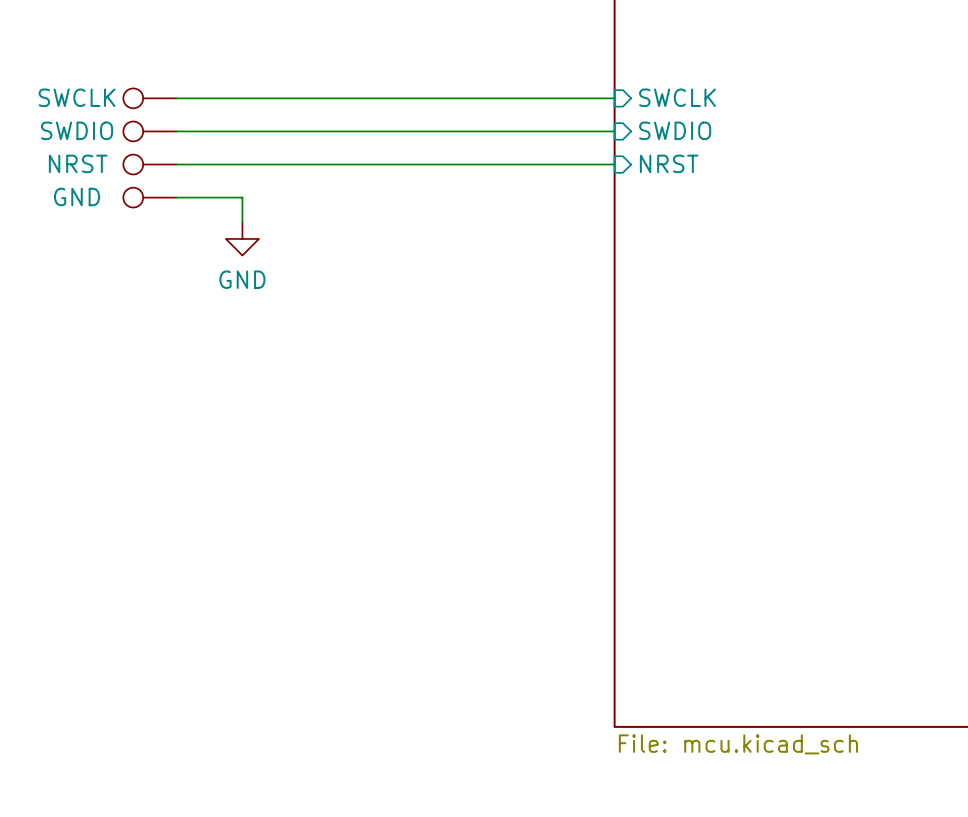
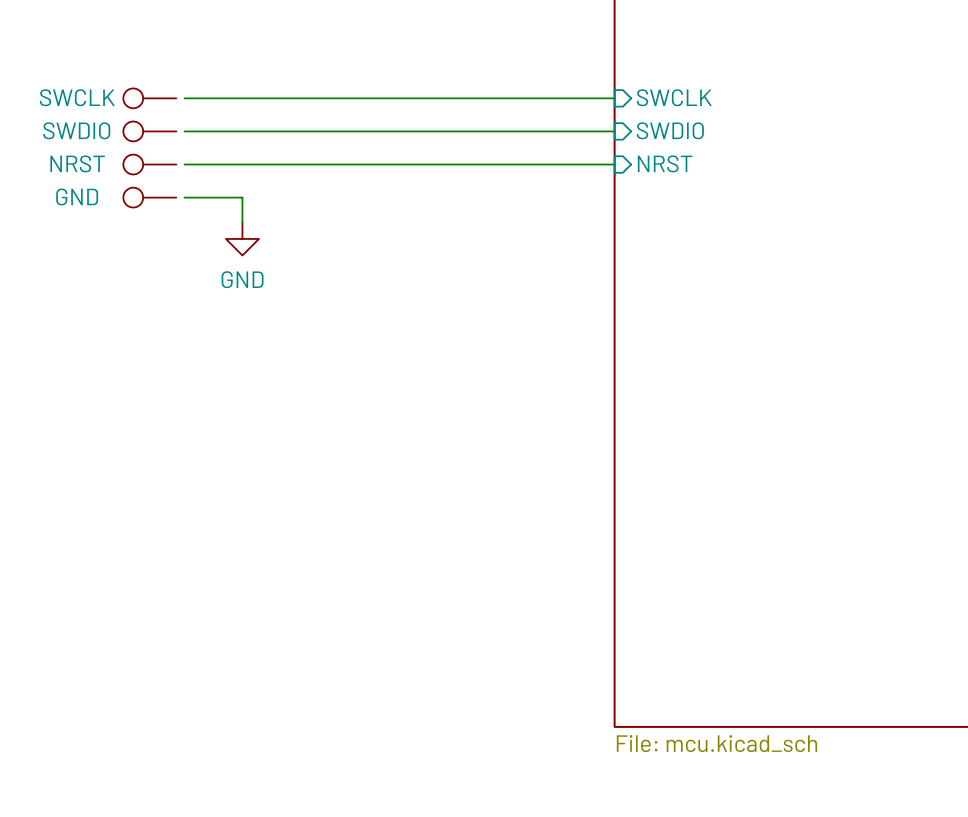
wire: (176, 98) (184, 98) -> none
wire: (176, 131) (184, 131) -> none
wire: (176, 164) (184, 164) -> none
wire: (176, 197) (184, 197) -> none

